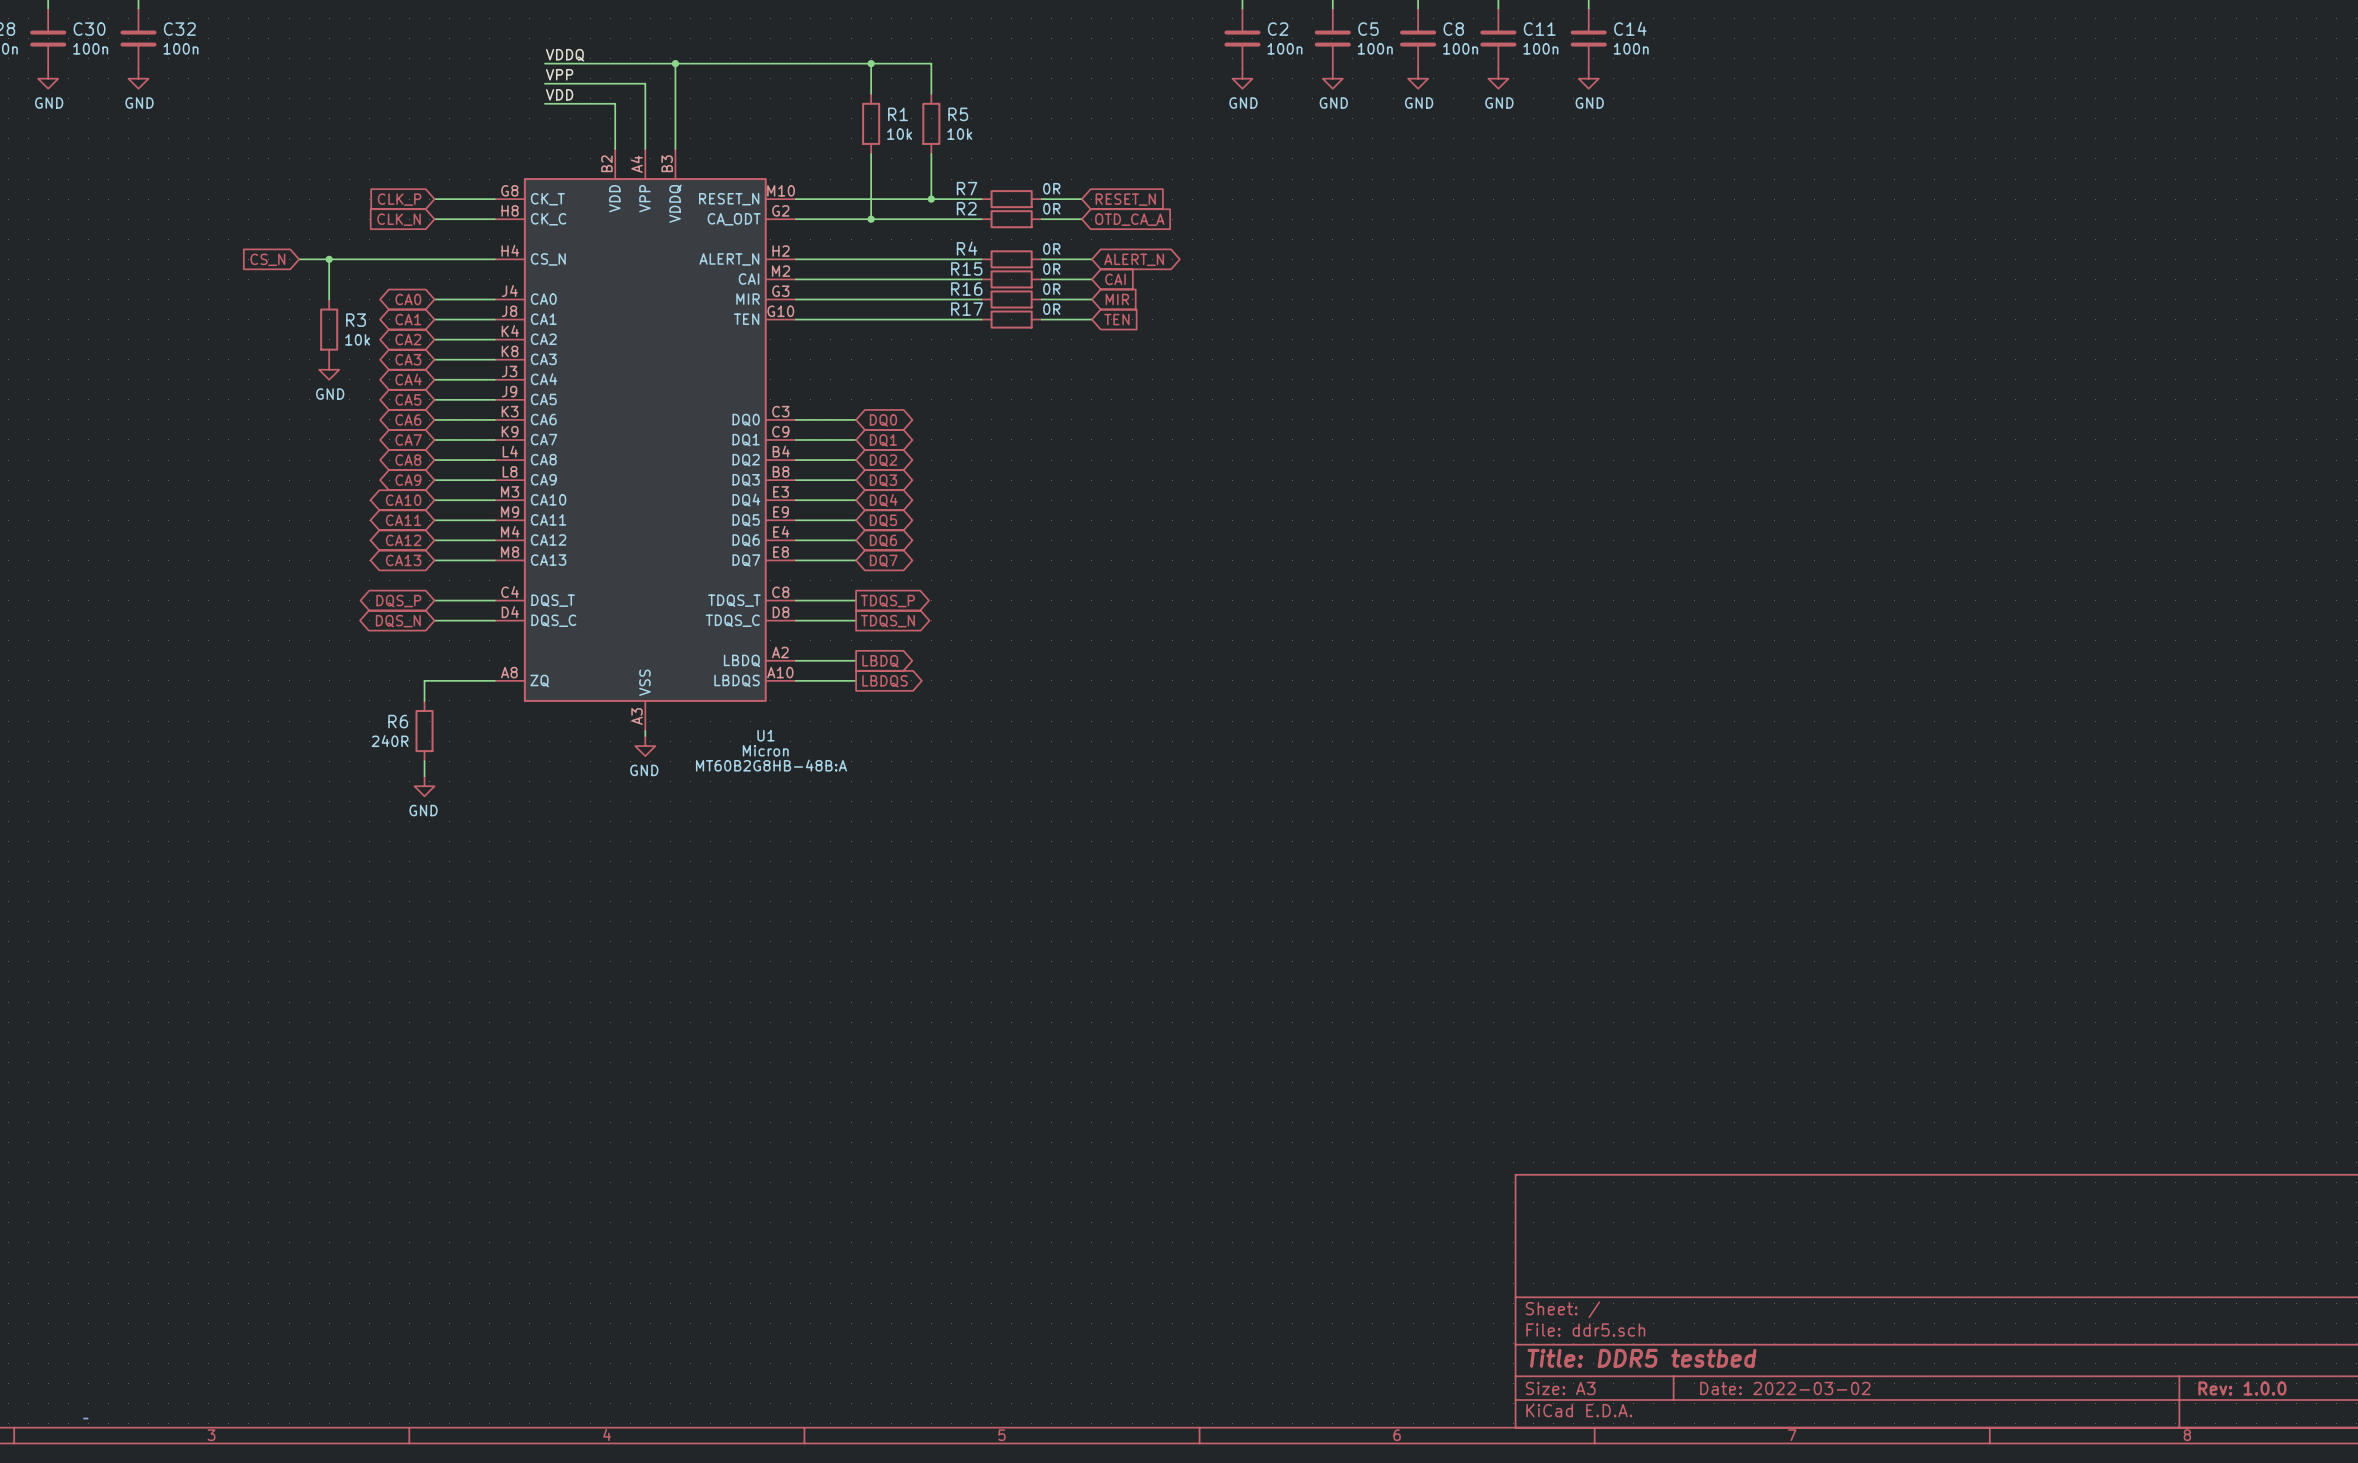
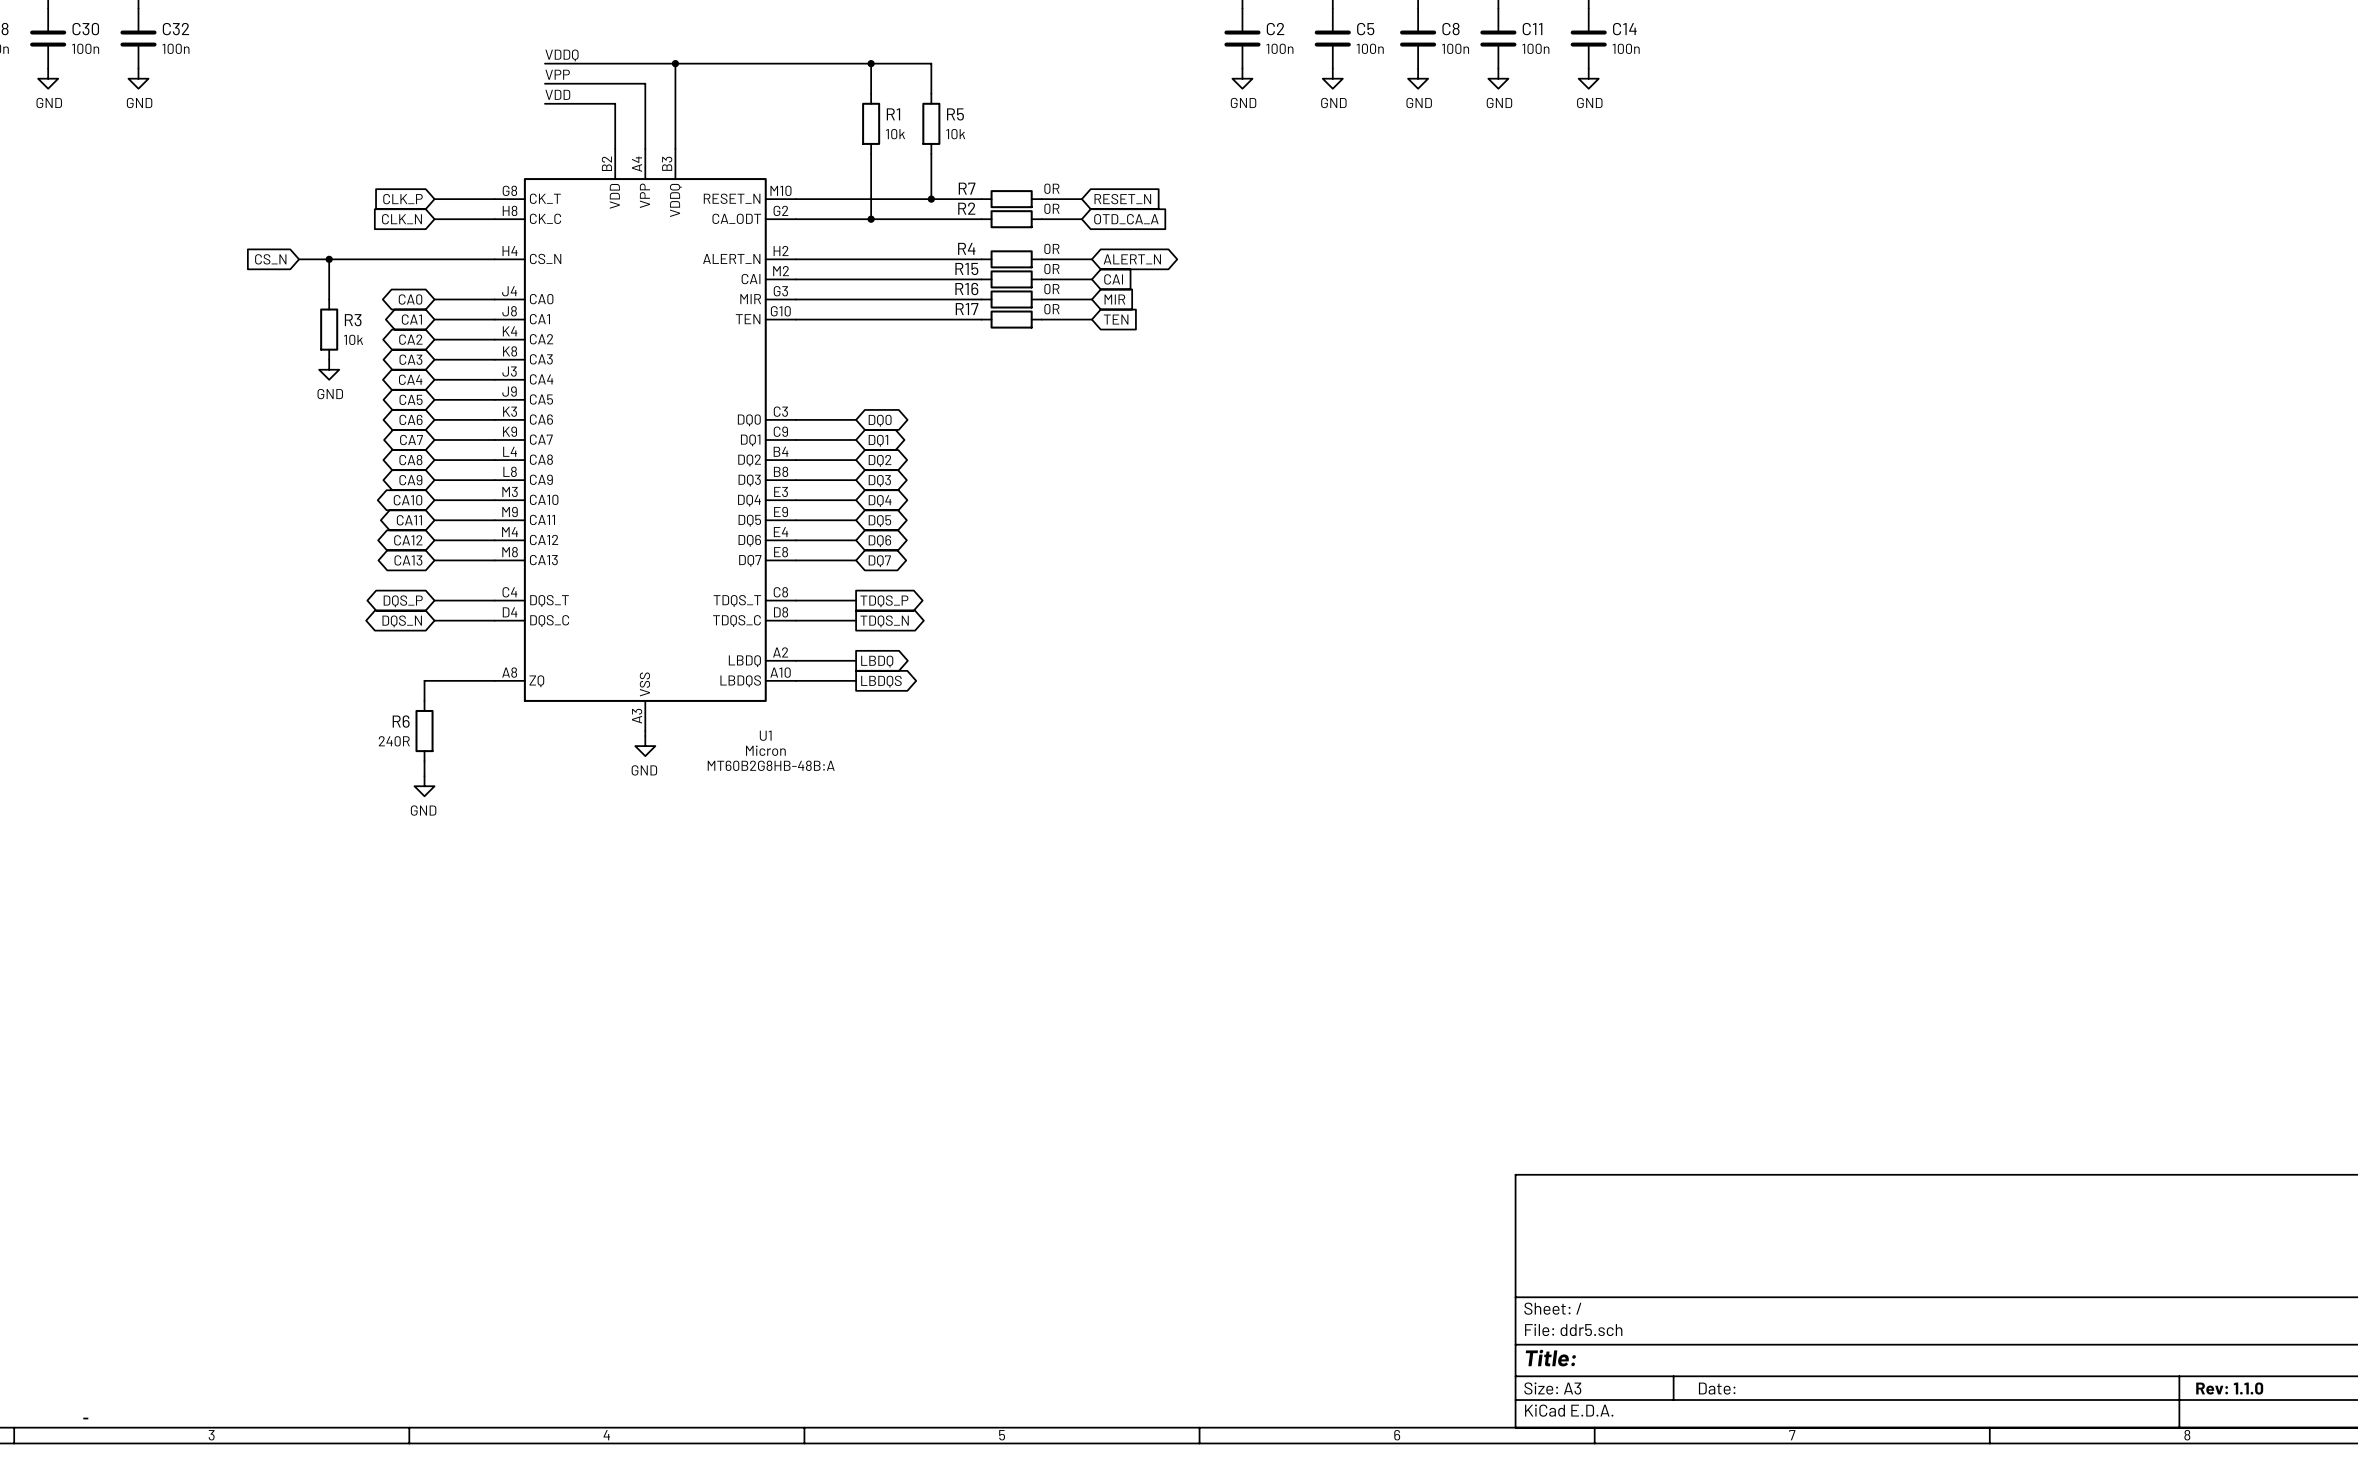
title block: Title: DDR5 testbed (1641, 1358) -> Title: (1550, 1358)
title block: Date: 2022-03-02 (1785, 1388) -> Date: (1717, 1388)
title block: Rev: 1.0.0 (2242, 1388) -> Rev: 1.1.0 (2229, 1388)

